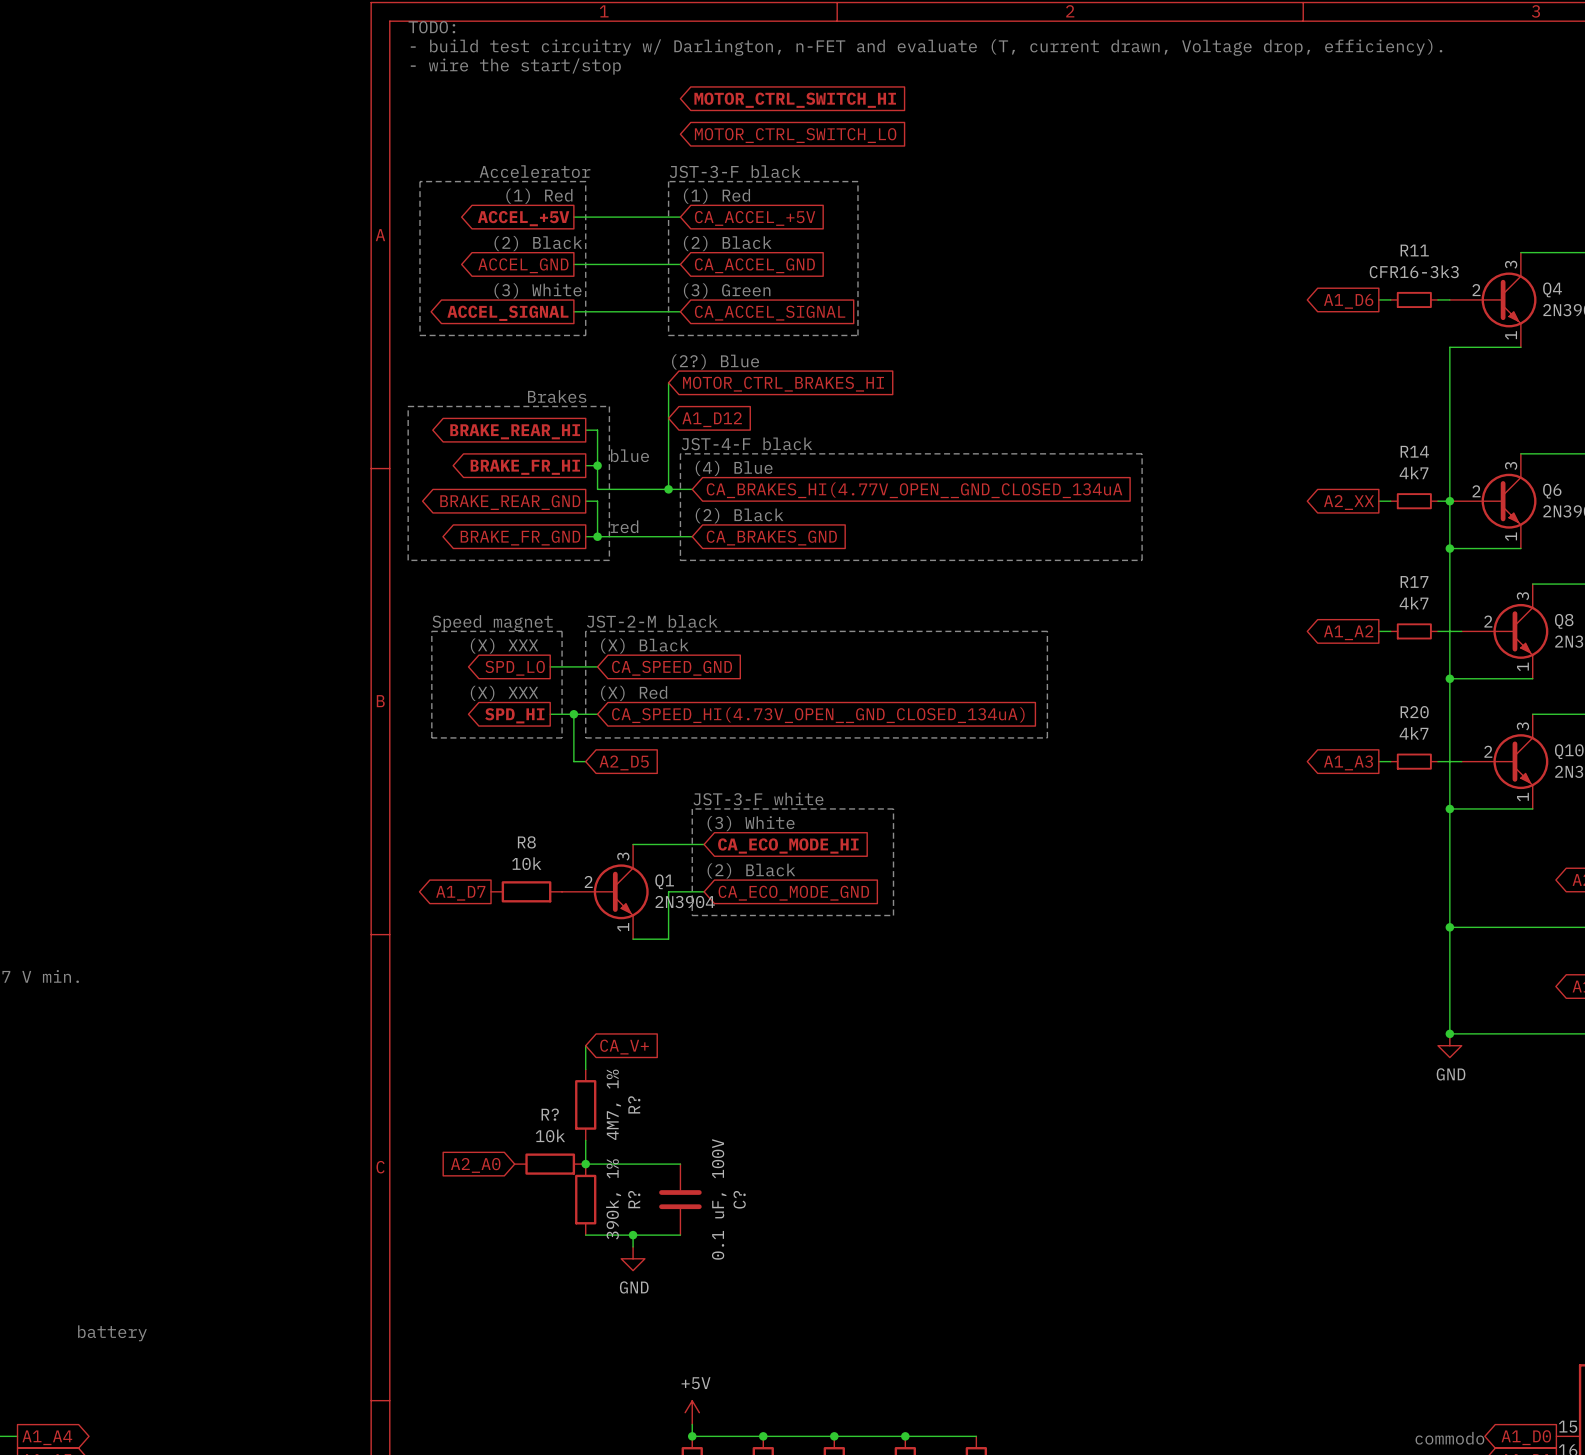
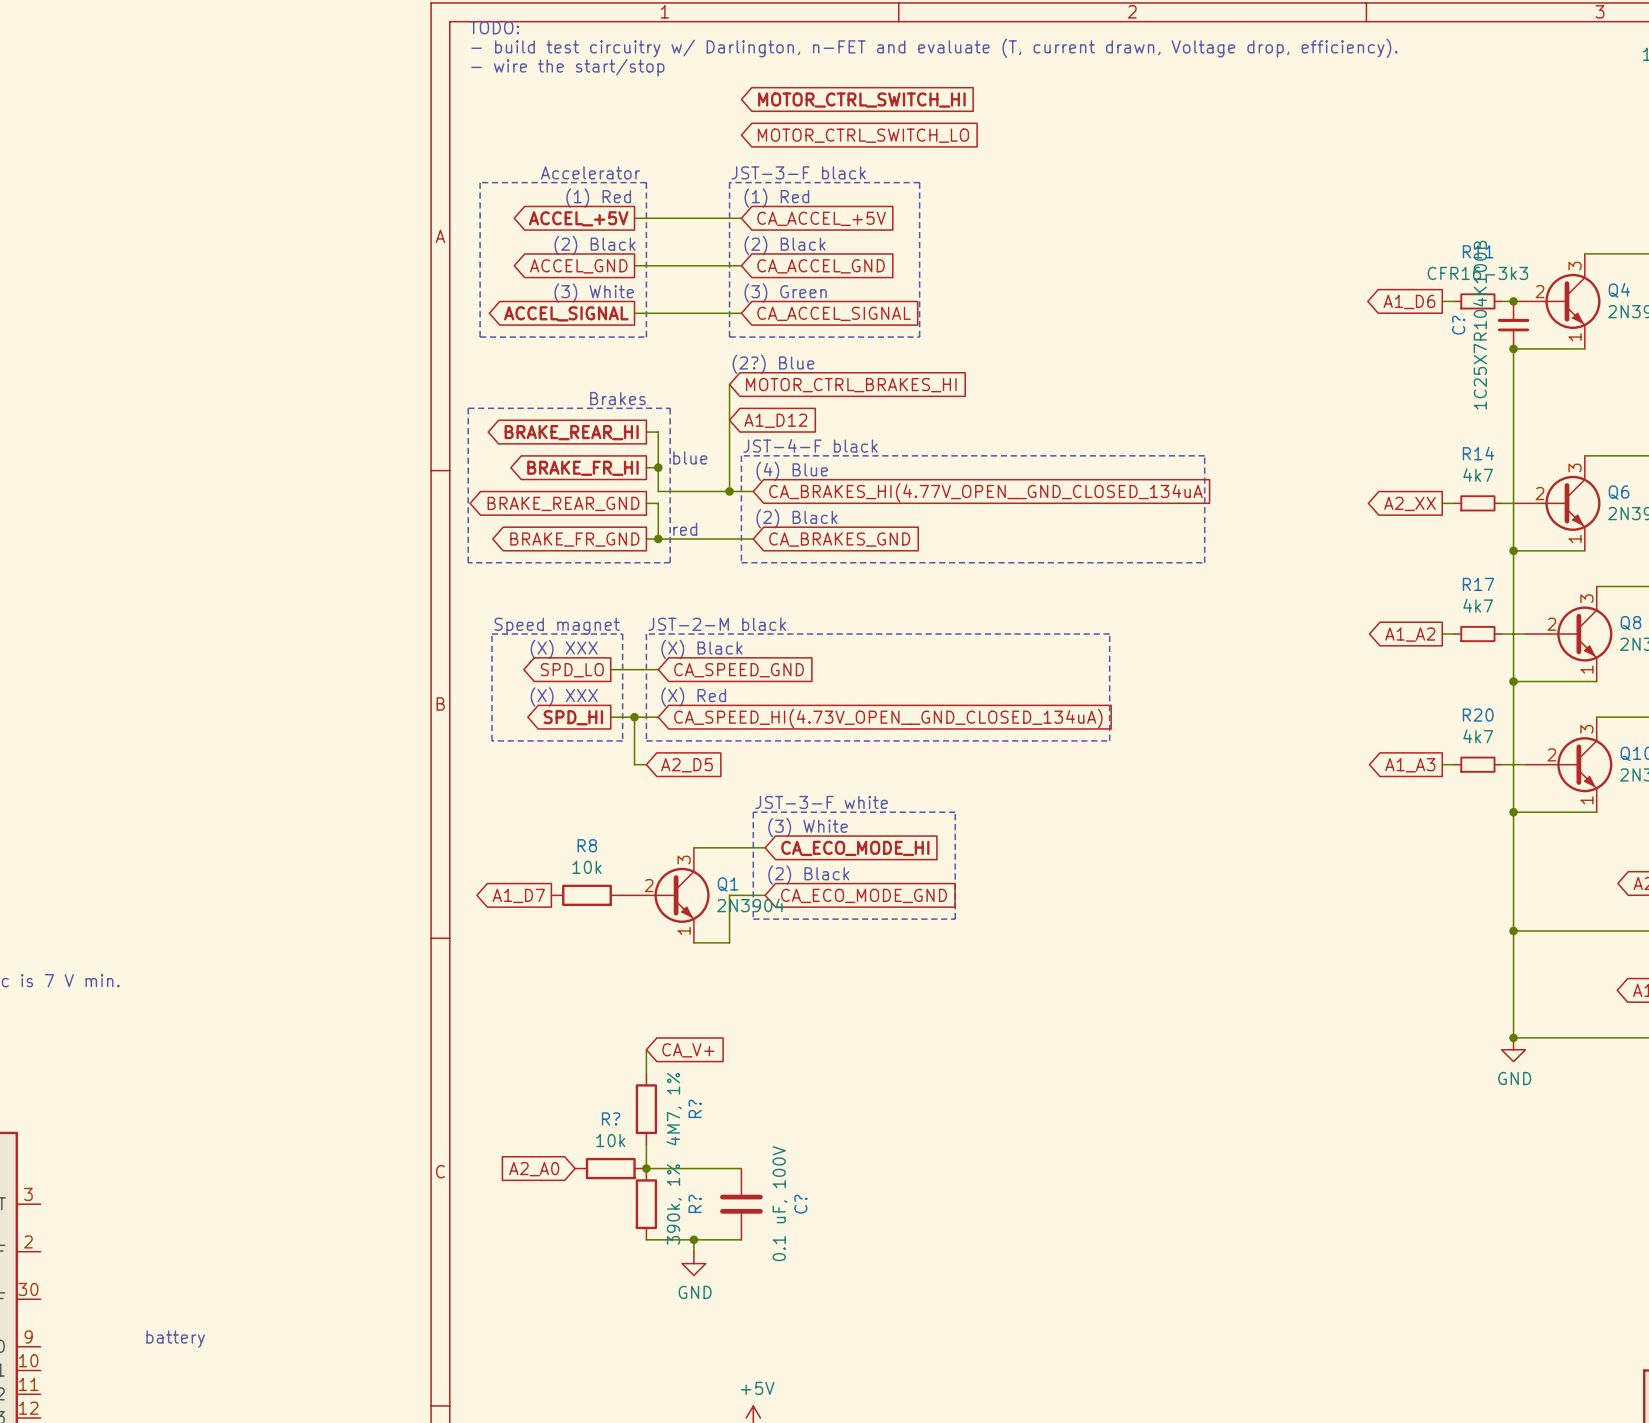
junction: none -> (1513, 301)
C?: none -> 1C25X7R104K100B (1513, 325)
junction: none -> (1513, 348)
junction: (1449, 501) -> none

